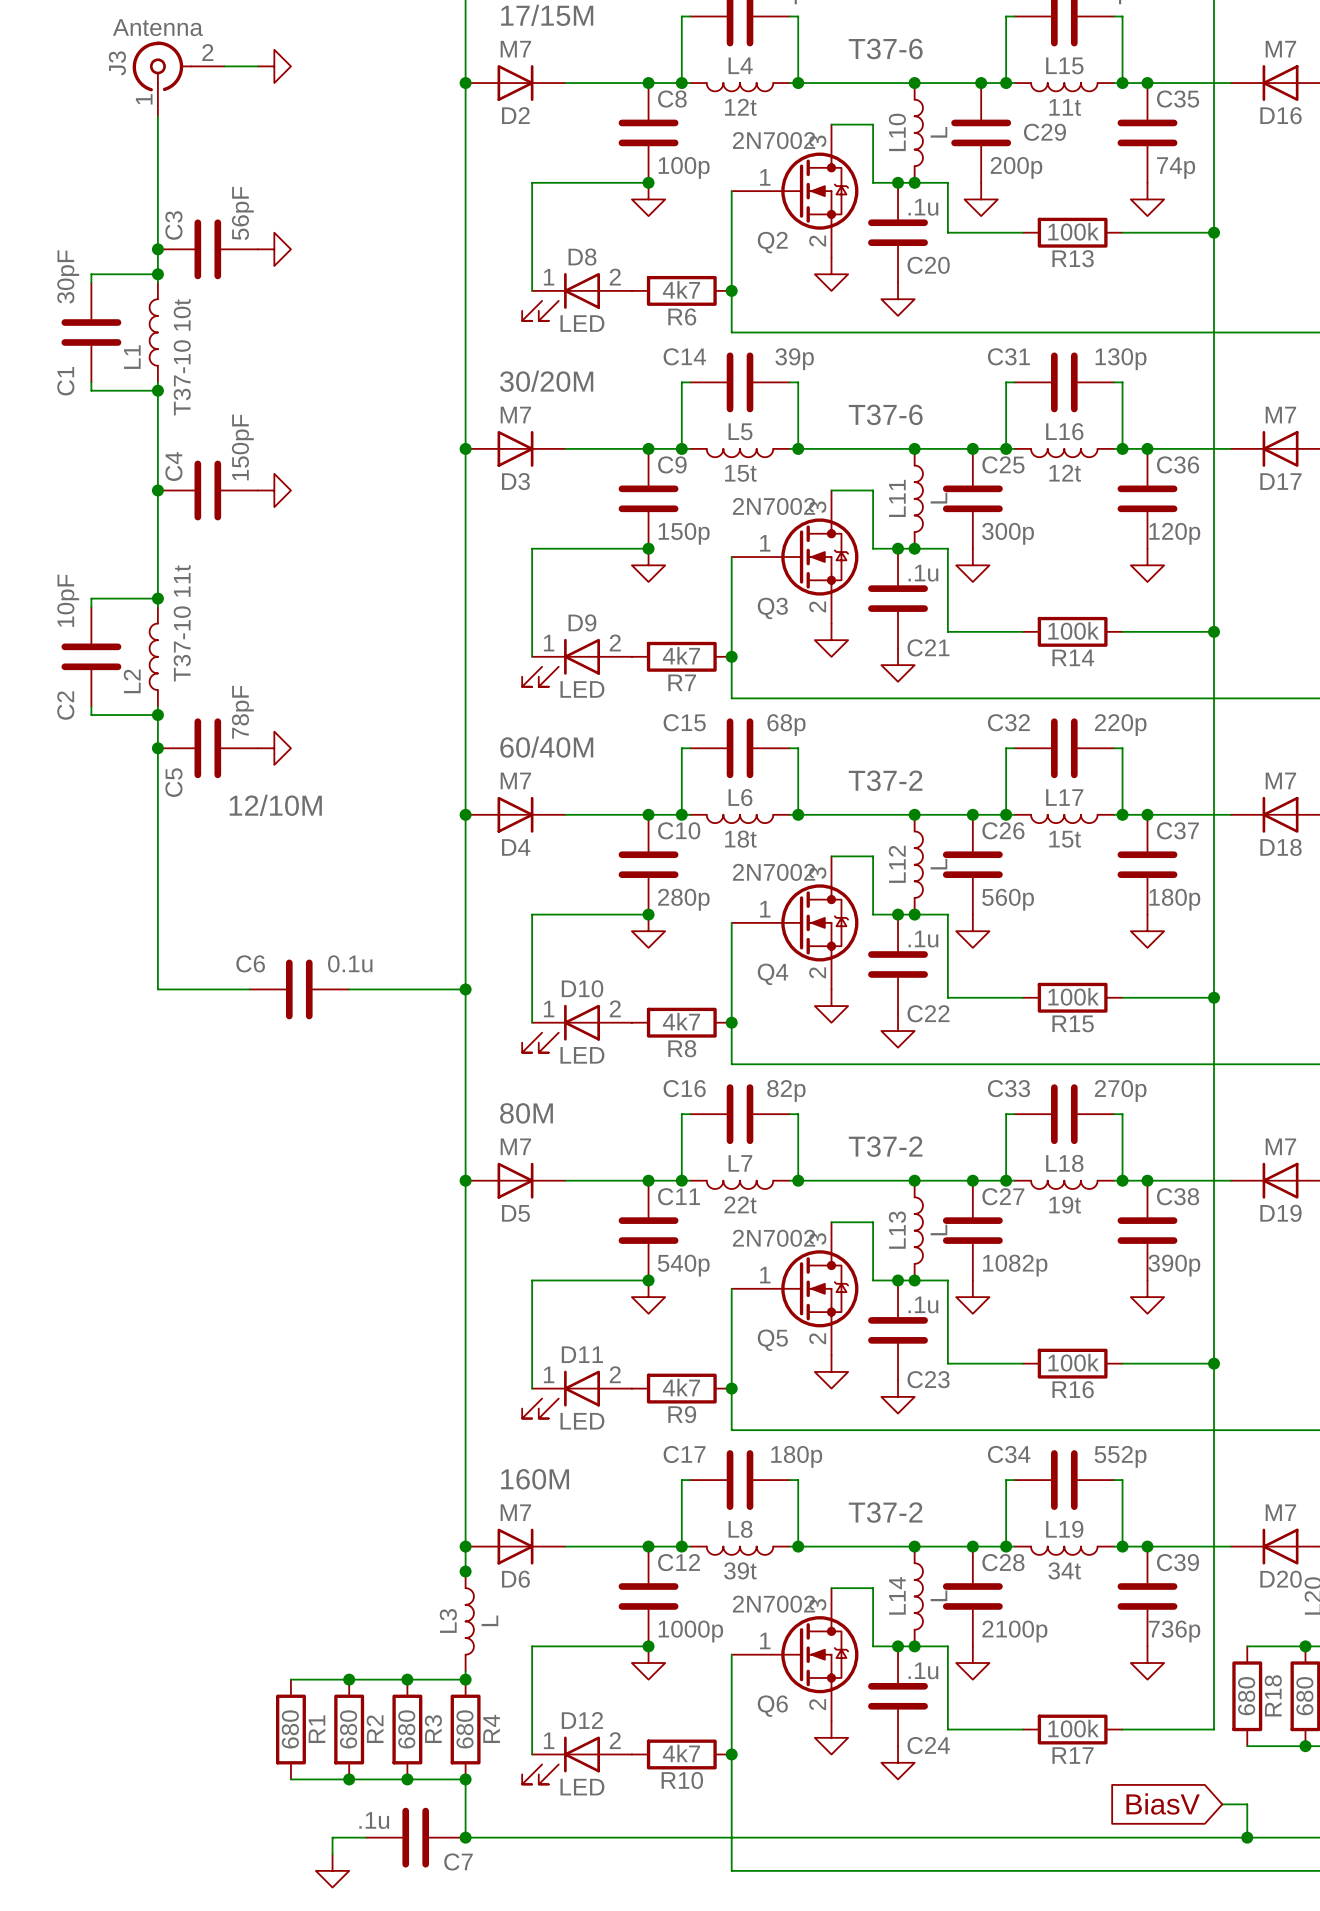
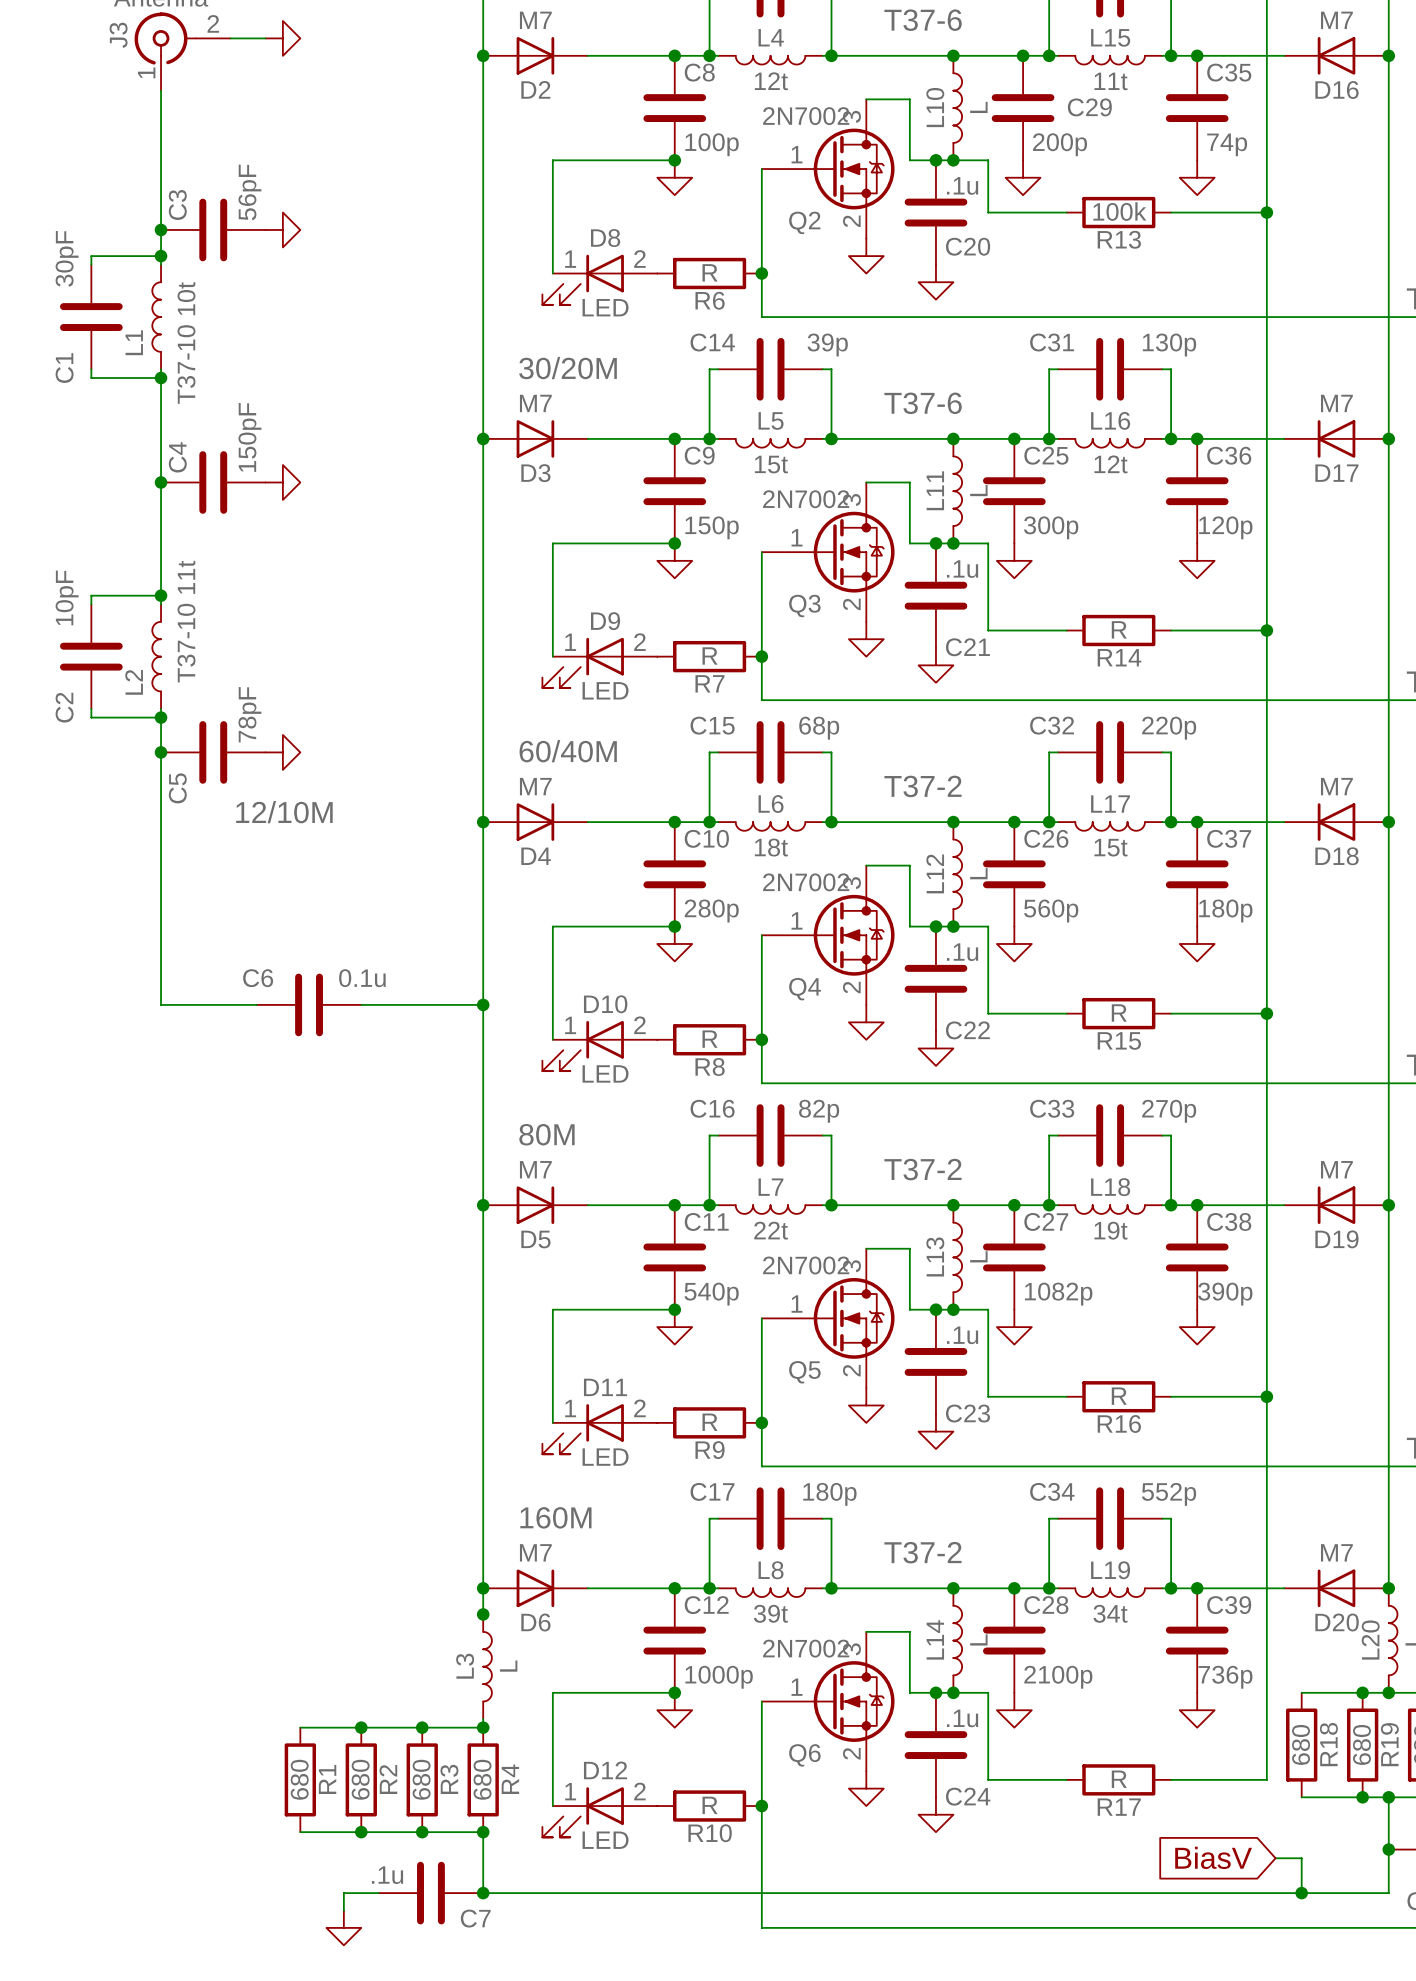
R6 value: 4k7 (681, 289) -> R (710, 272)
R14 value: 100k (1073, 630) -> R (1119, 629)
R7 value: 4k7 (681, 655) -> R (710, 655)
R15 value: 100k (1073, 996) -> R (1119, 1012)
R8 value: 4k7 (681, 1021) -> R (710, 1039)
R16 value: 100k (1073, 1362) -> R (1119, 1396)
R9 value: 4k7 (681, 1387) -> R (710, 1422)
R17 value: 100k (1073, 1728) -> R (1119, 1779)
R10 value: 4k7 (681, 1753) -> R (710, 1805)

